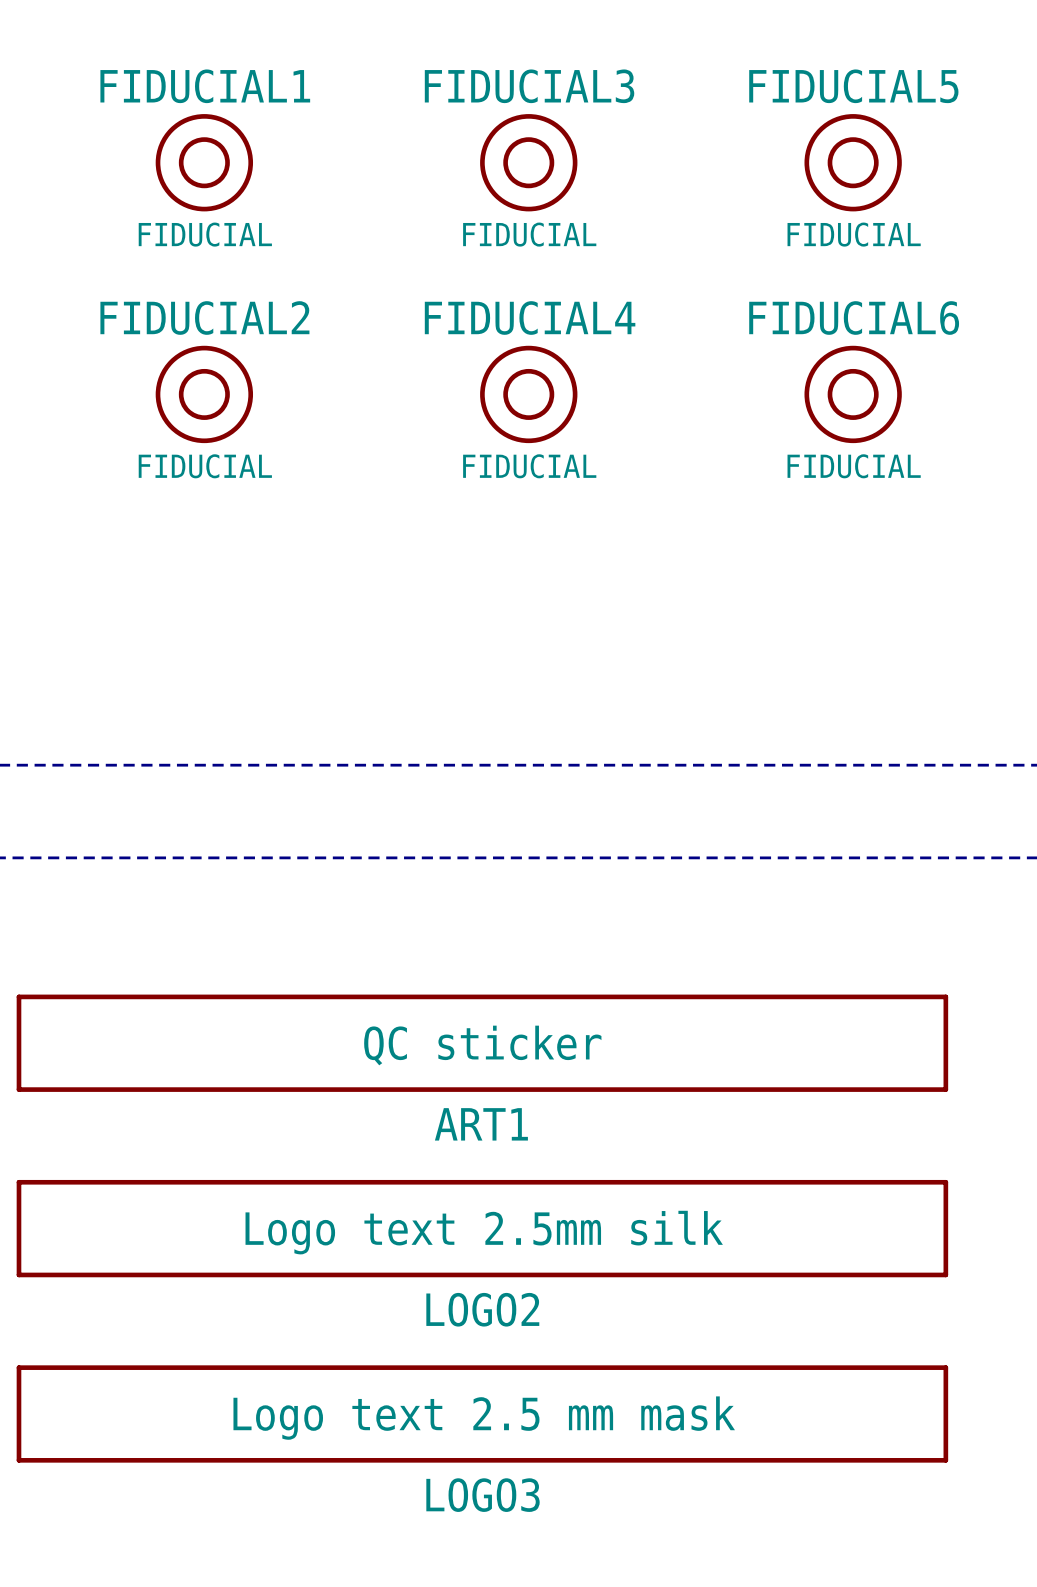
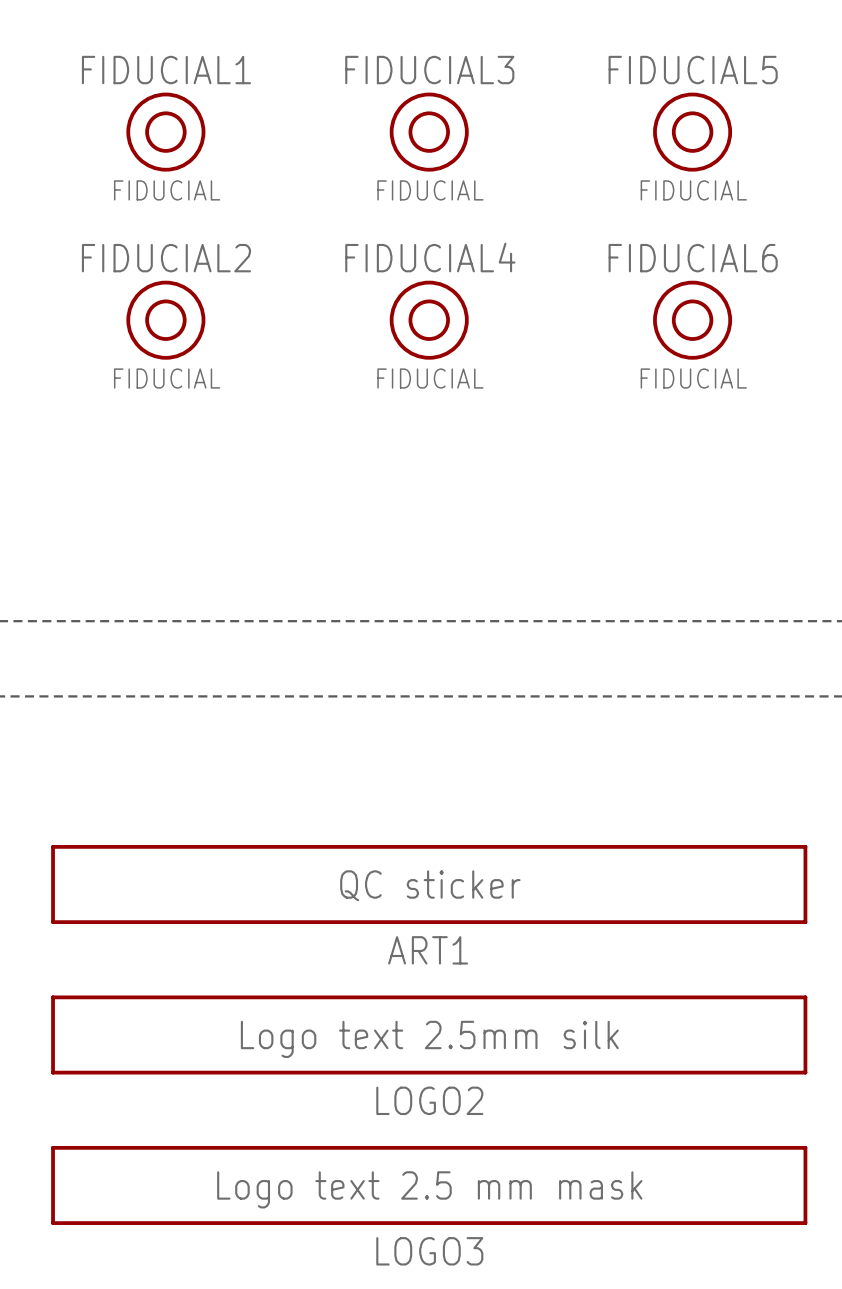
ART1 position: (482, 1043) -> (429, 884)
LOGO2 position: (482, 1228) -> (429, 1034)
LOGO3 position: (482, 1413) -> (429, 1185)

